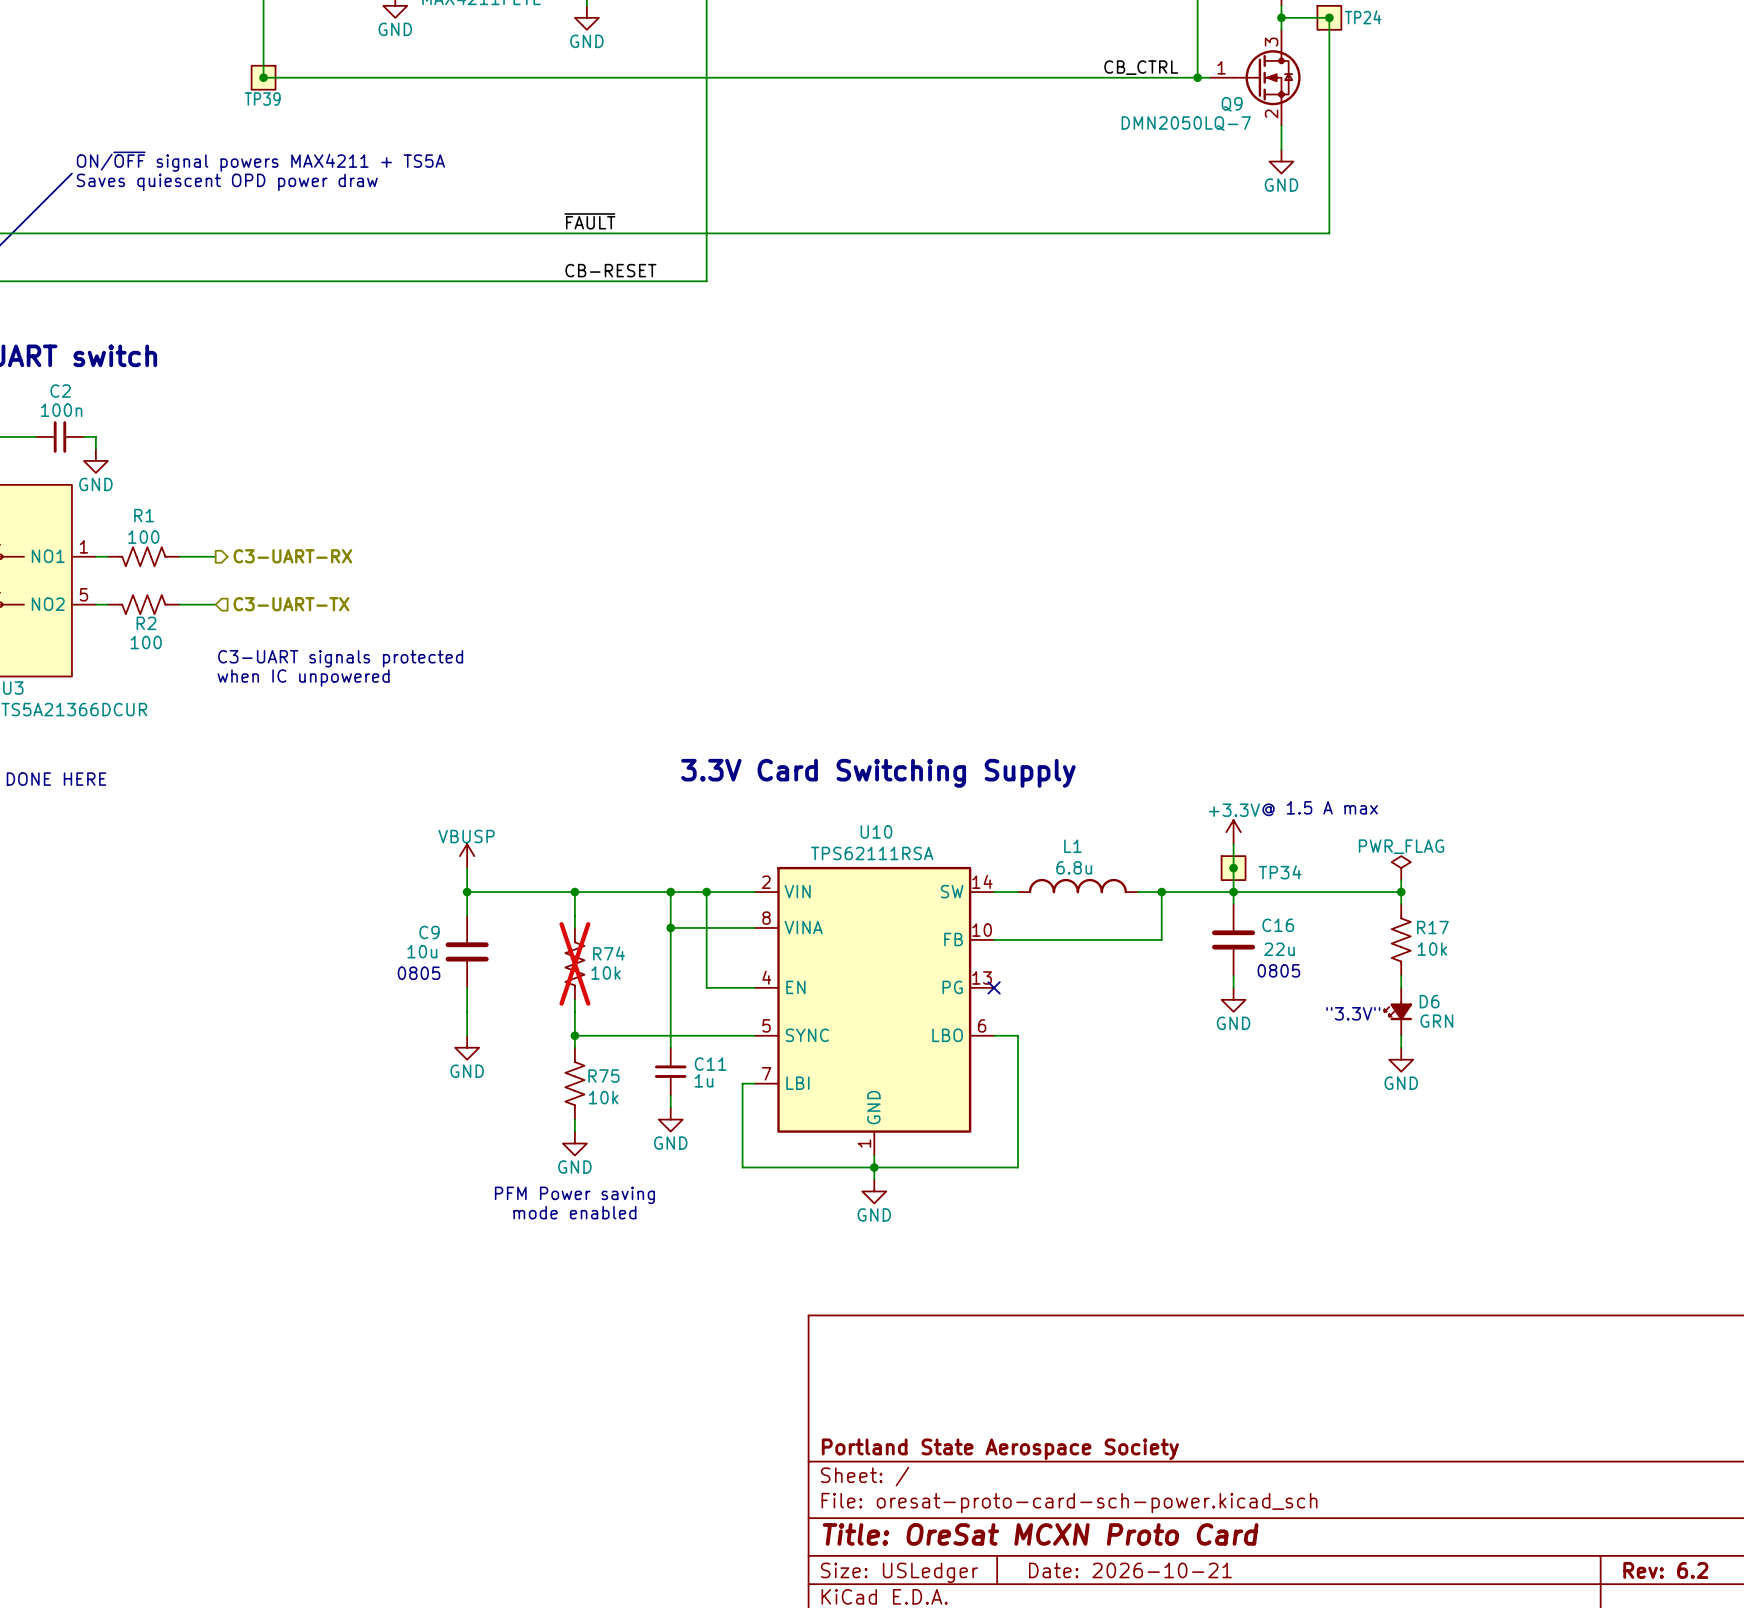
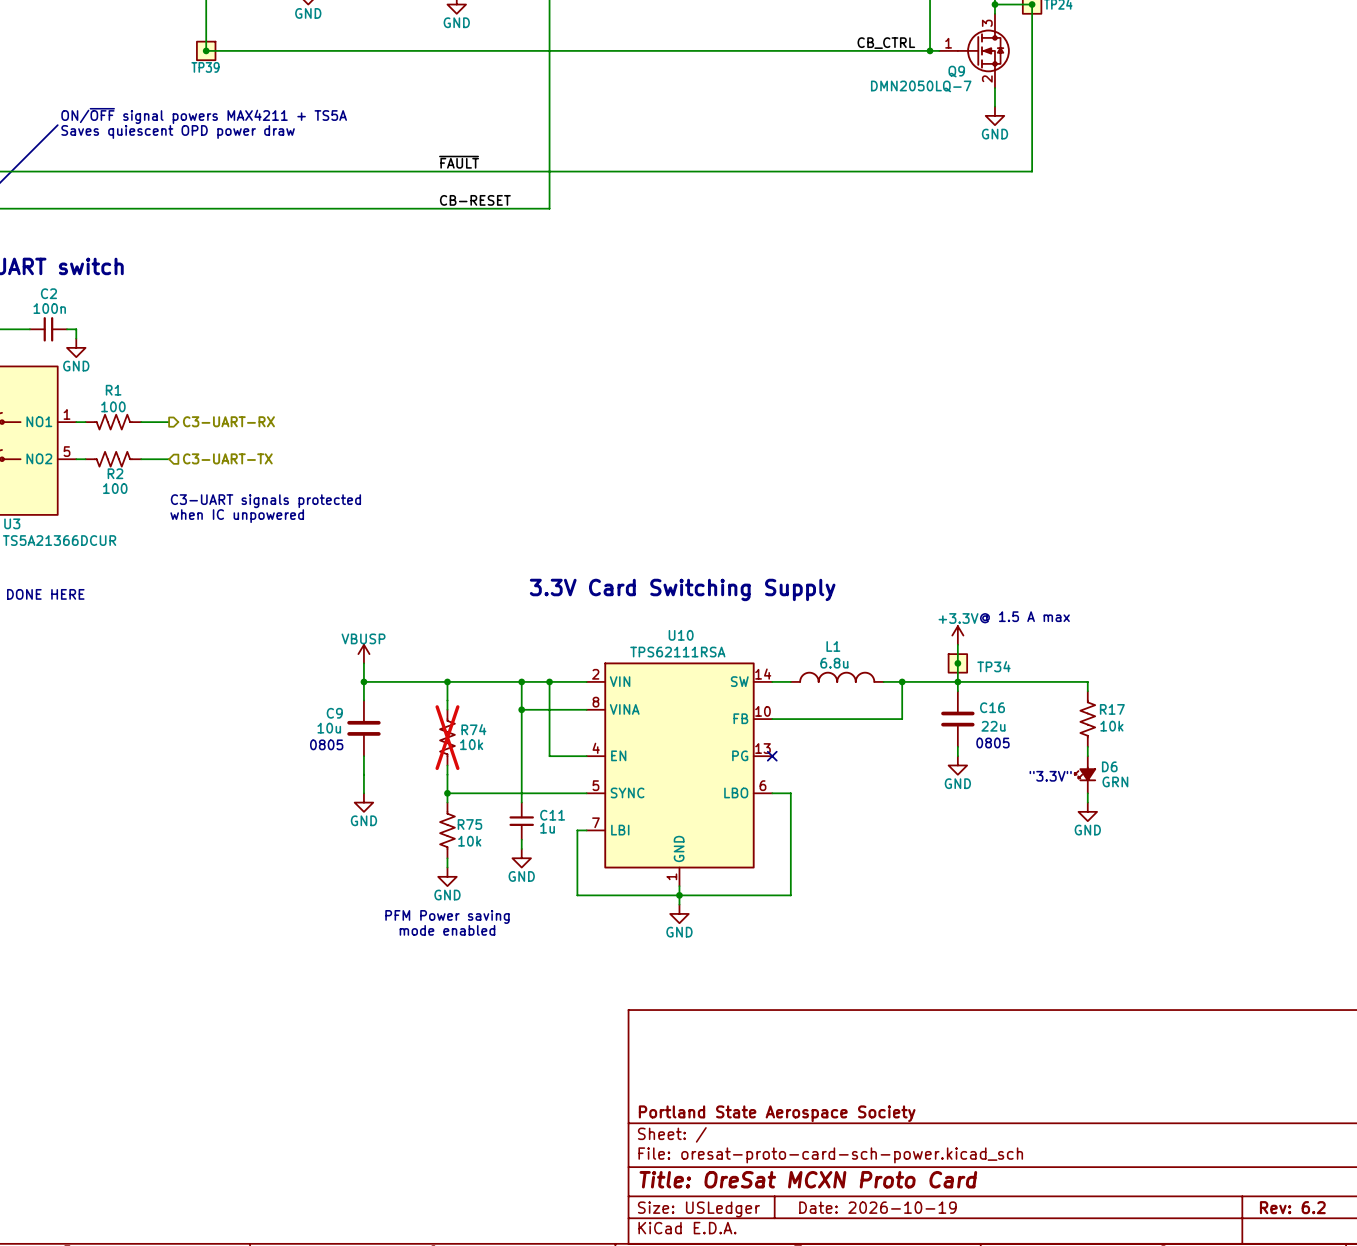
power symbol: PWR_FLAG (1401, 868) -> none
wire: (1401, 880) (1401, 892) -> none
junction: (1401, 892) -> none
title block: Date: 2026-10-21 (1130, 1570) -> Date: 2026-10-19 (877, 1207)

